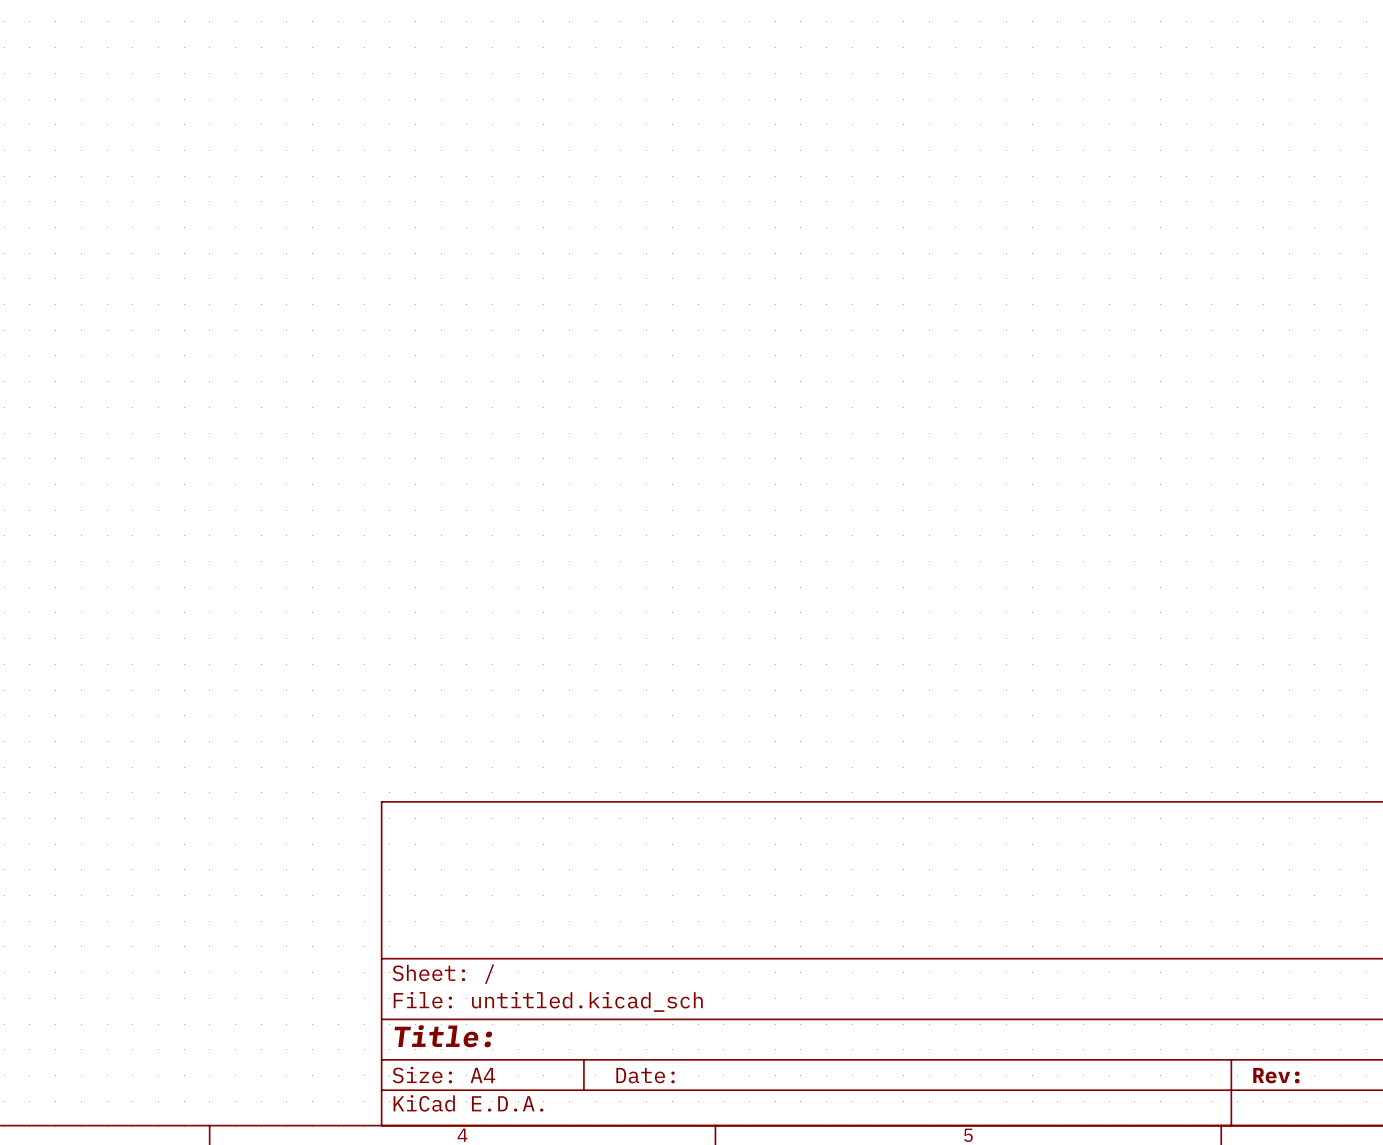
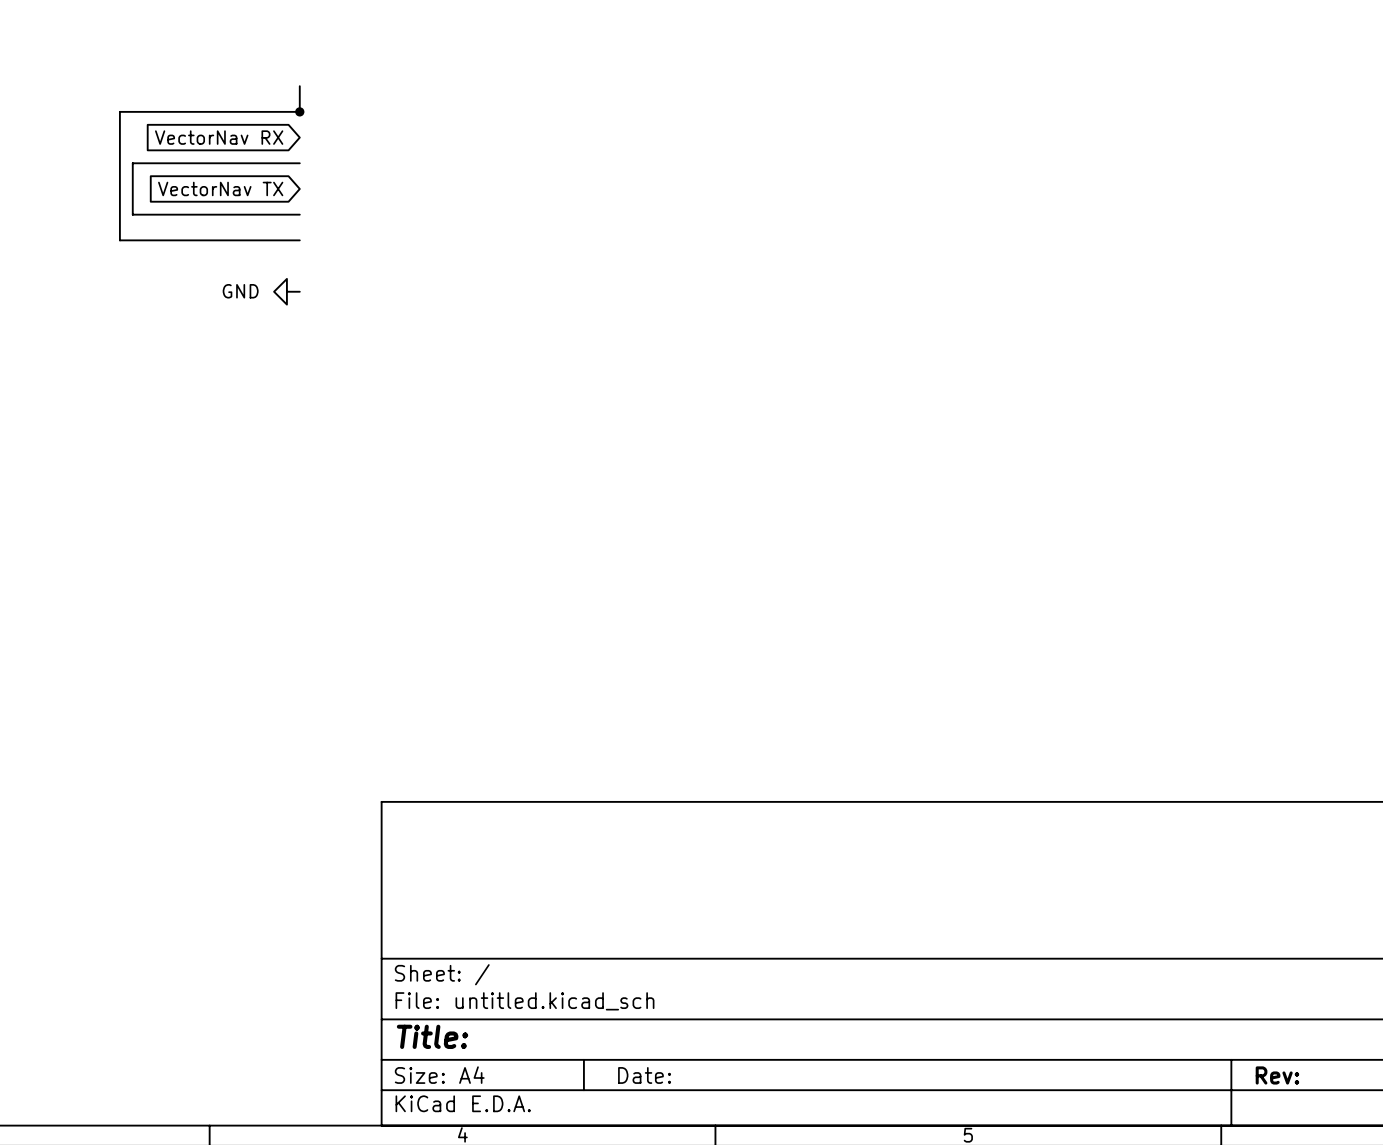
wire: none -> (299, 86) (299, 111) (119, 111) (119, 240) (299, 240)
junction: none -> (299, 111)
global label: none -> VectorNav RX (219, 137)
wire: none -> (299, 163) (132, 163) (132, 214) (299, 214)
global label: none -> VectorNav TX (220, 188)
power symbol: none -> GND (286, 291)

